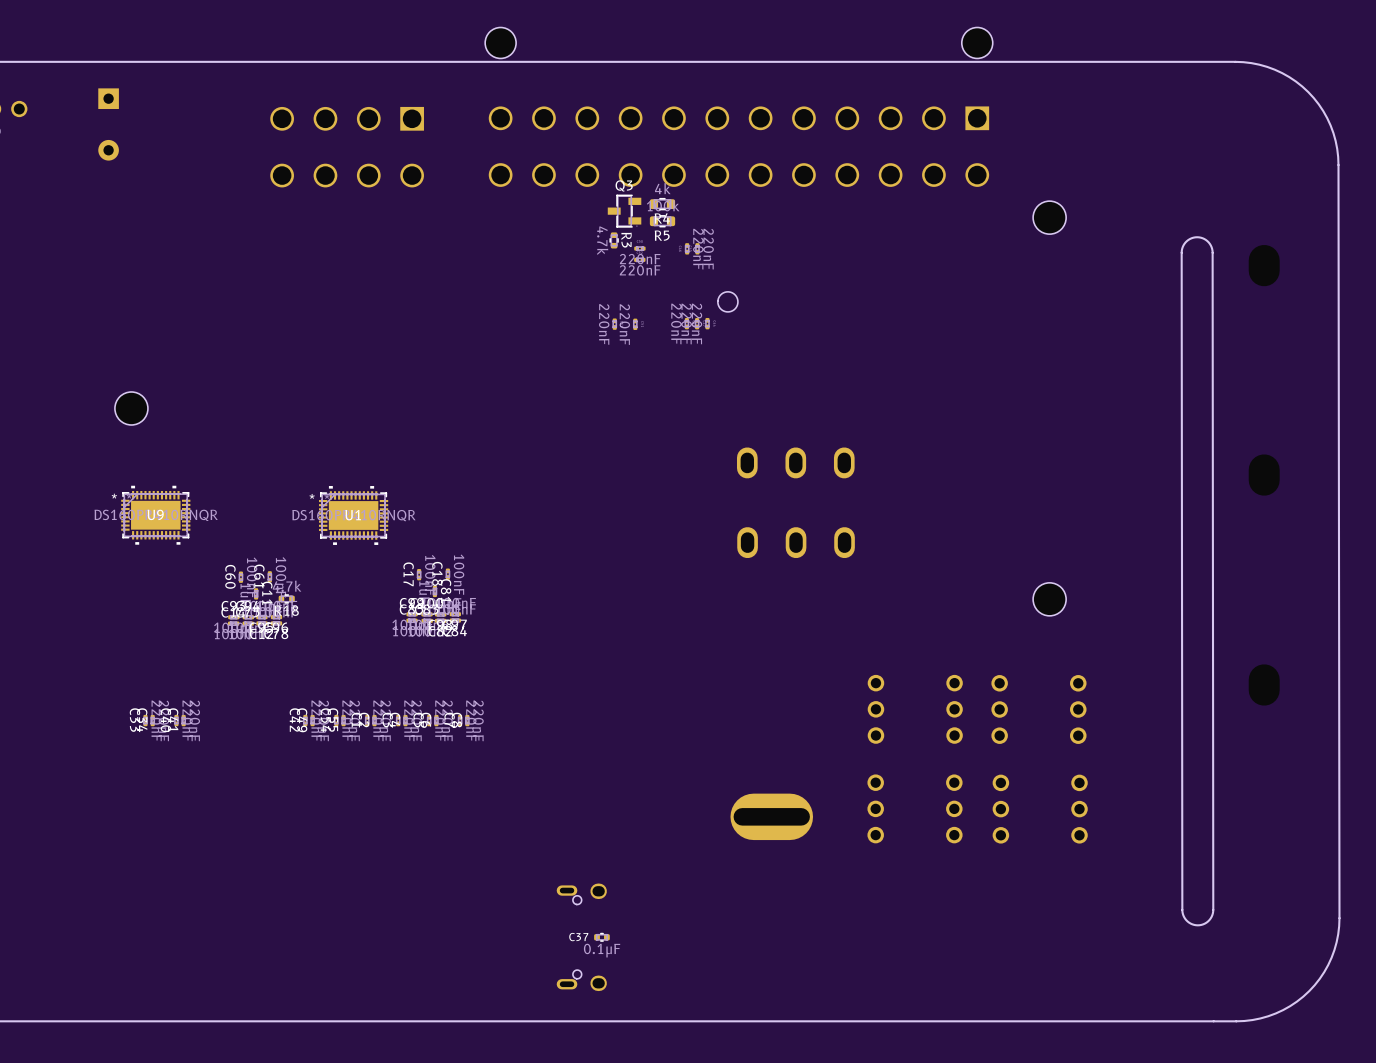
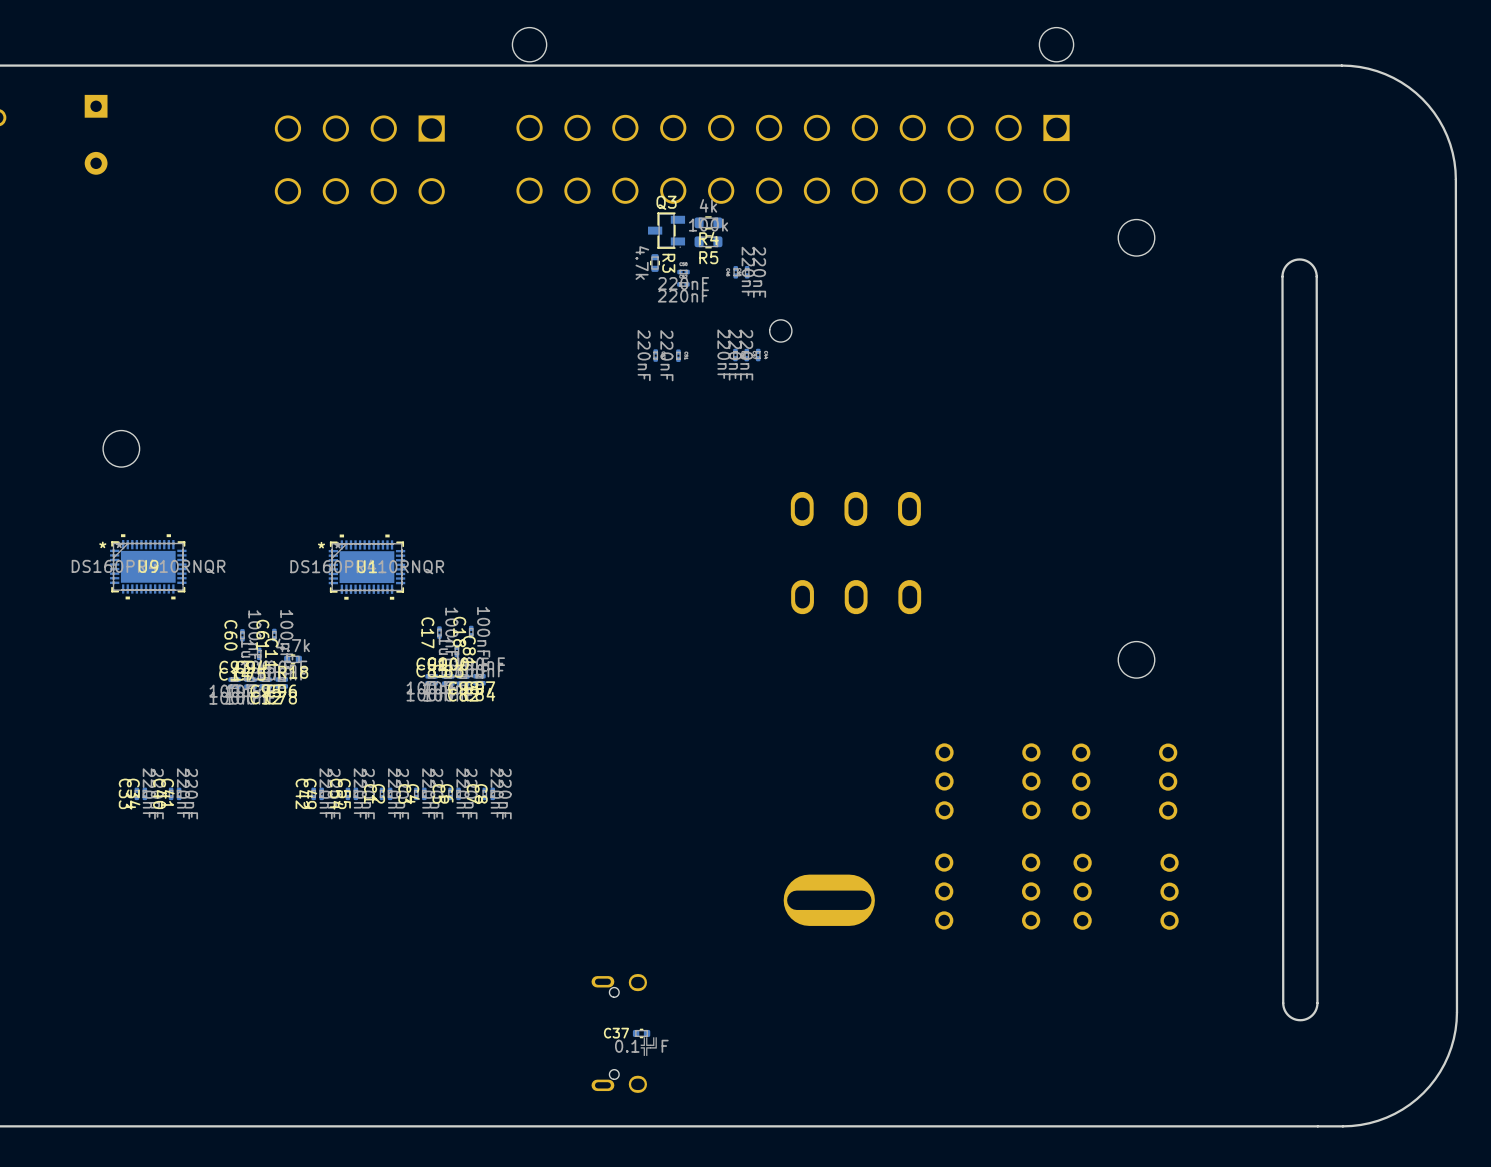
C37 value: 0.1μF (602, 950) -> 0.1╬╝F (641, 1046)

